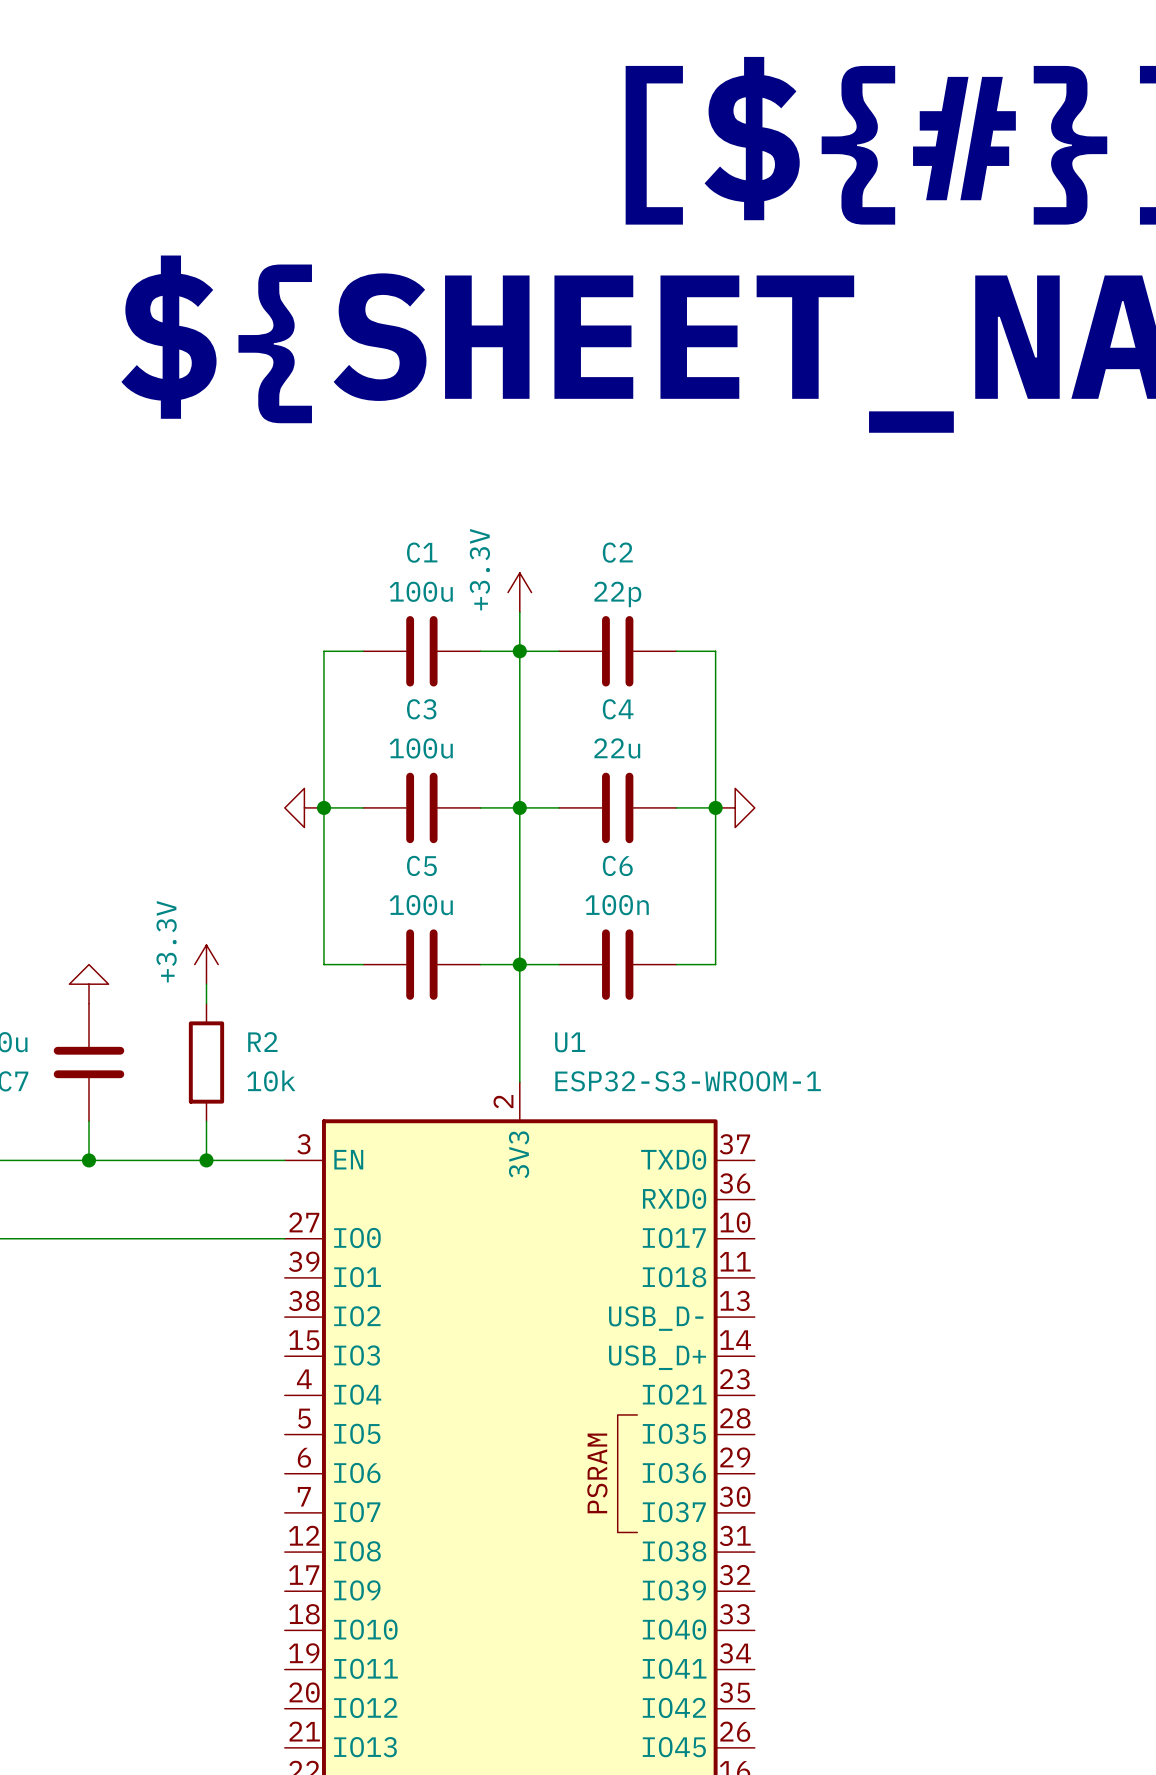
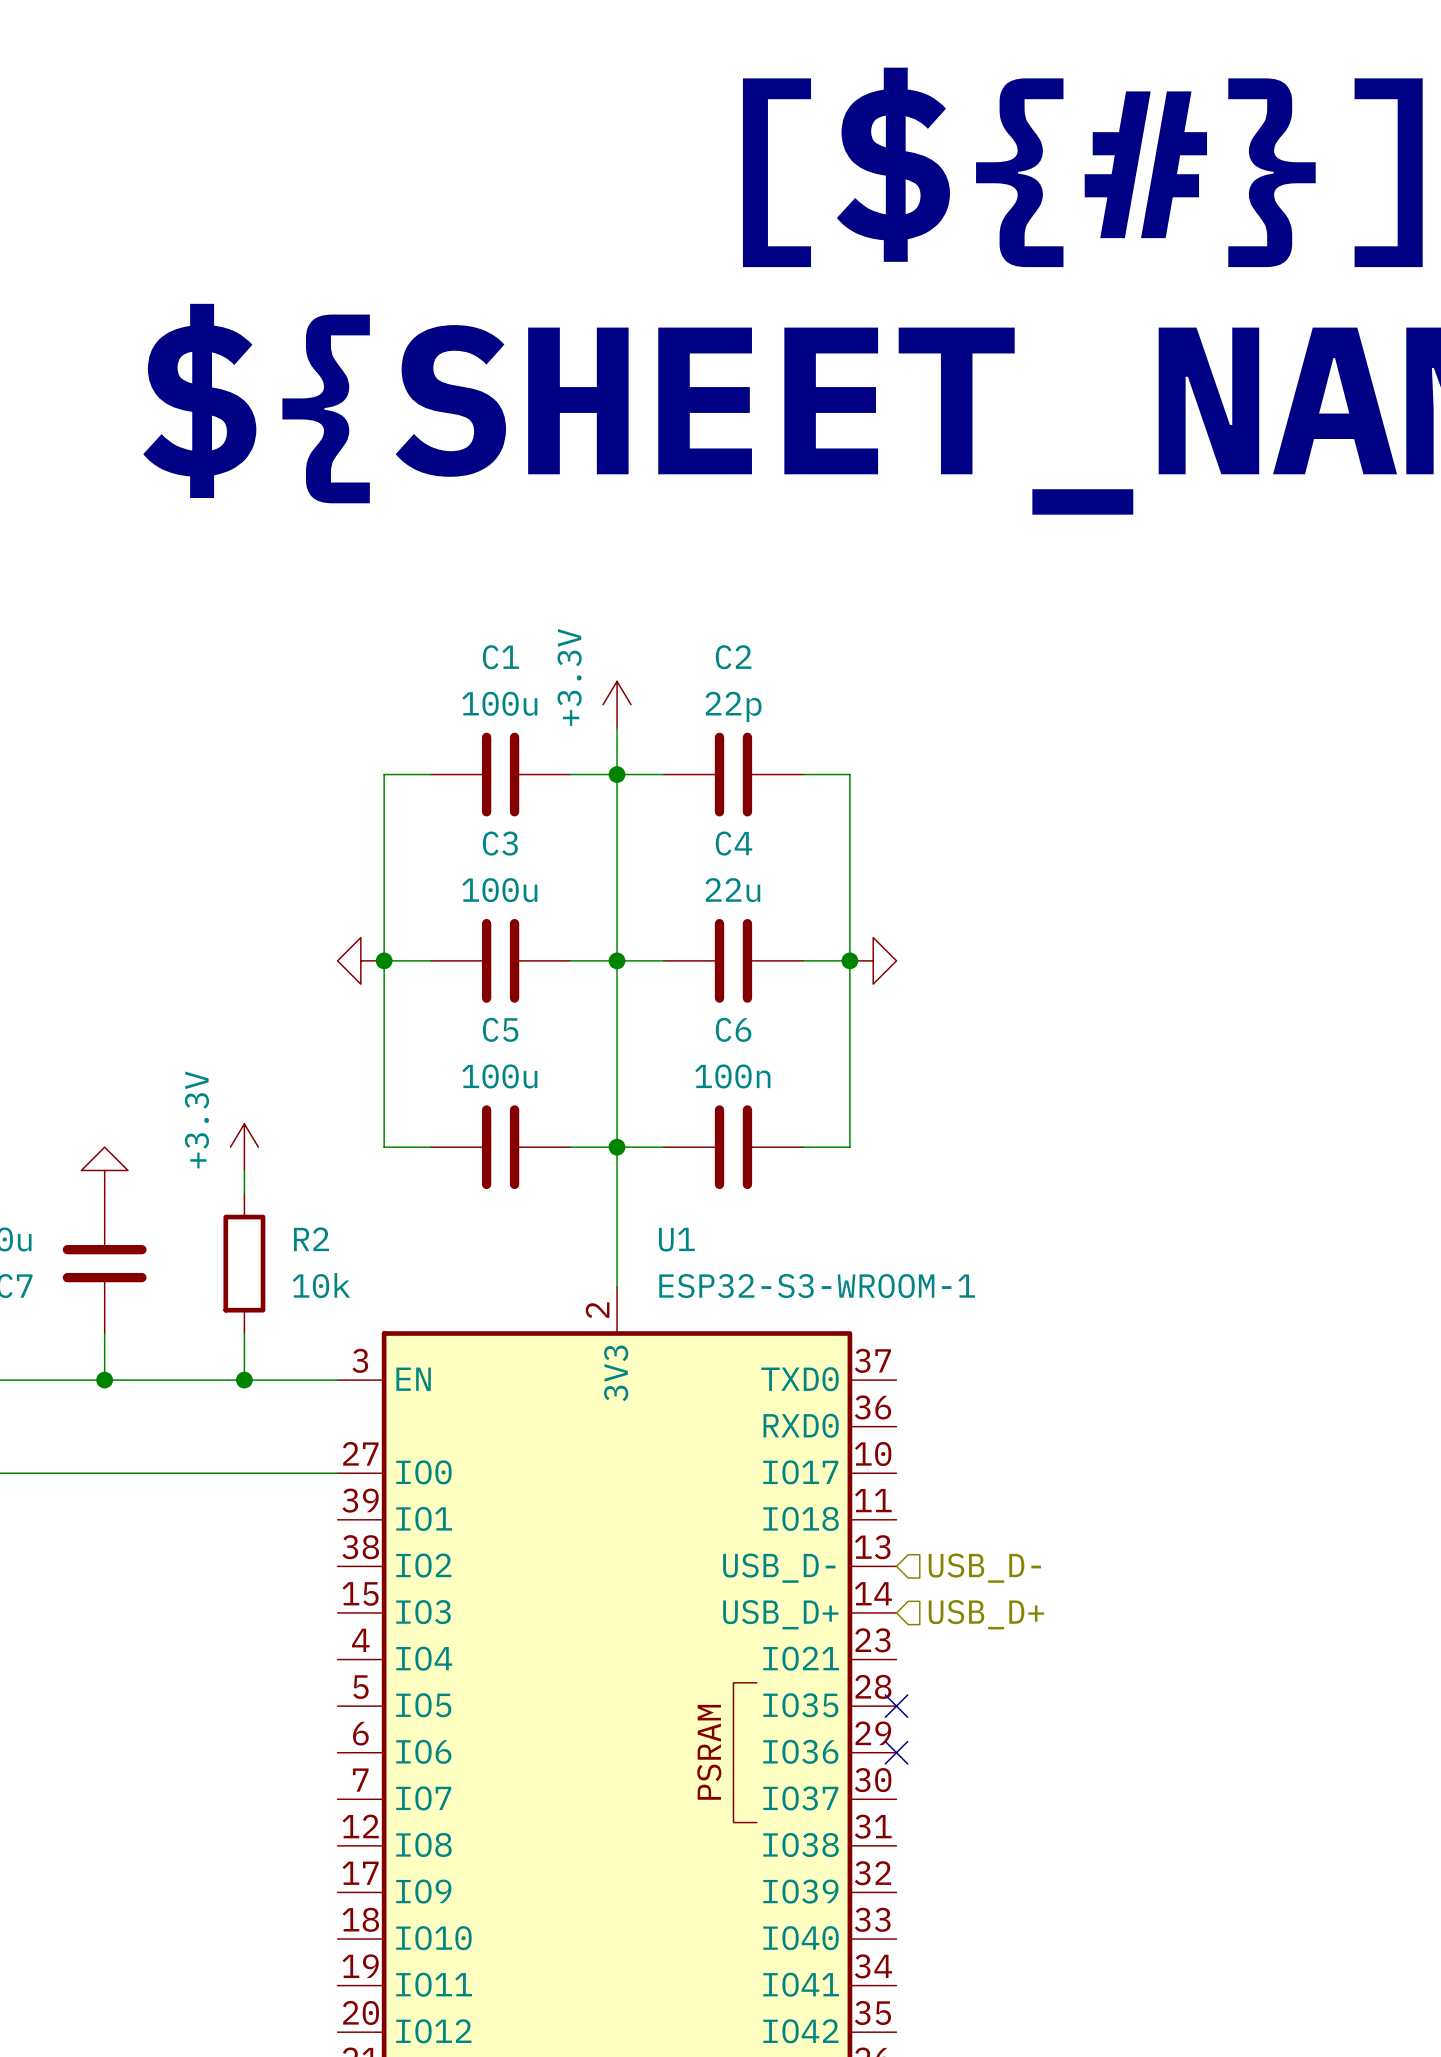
hierarchical label: none -> USB_D- (984, 1568)
hierarchical label: none -> USB_D+ (986, 1614)
no-connect mark: none -> (896, 1706)
no-connect mark: none -> (896, 1752)

